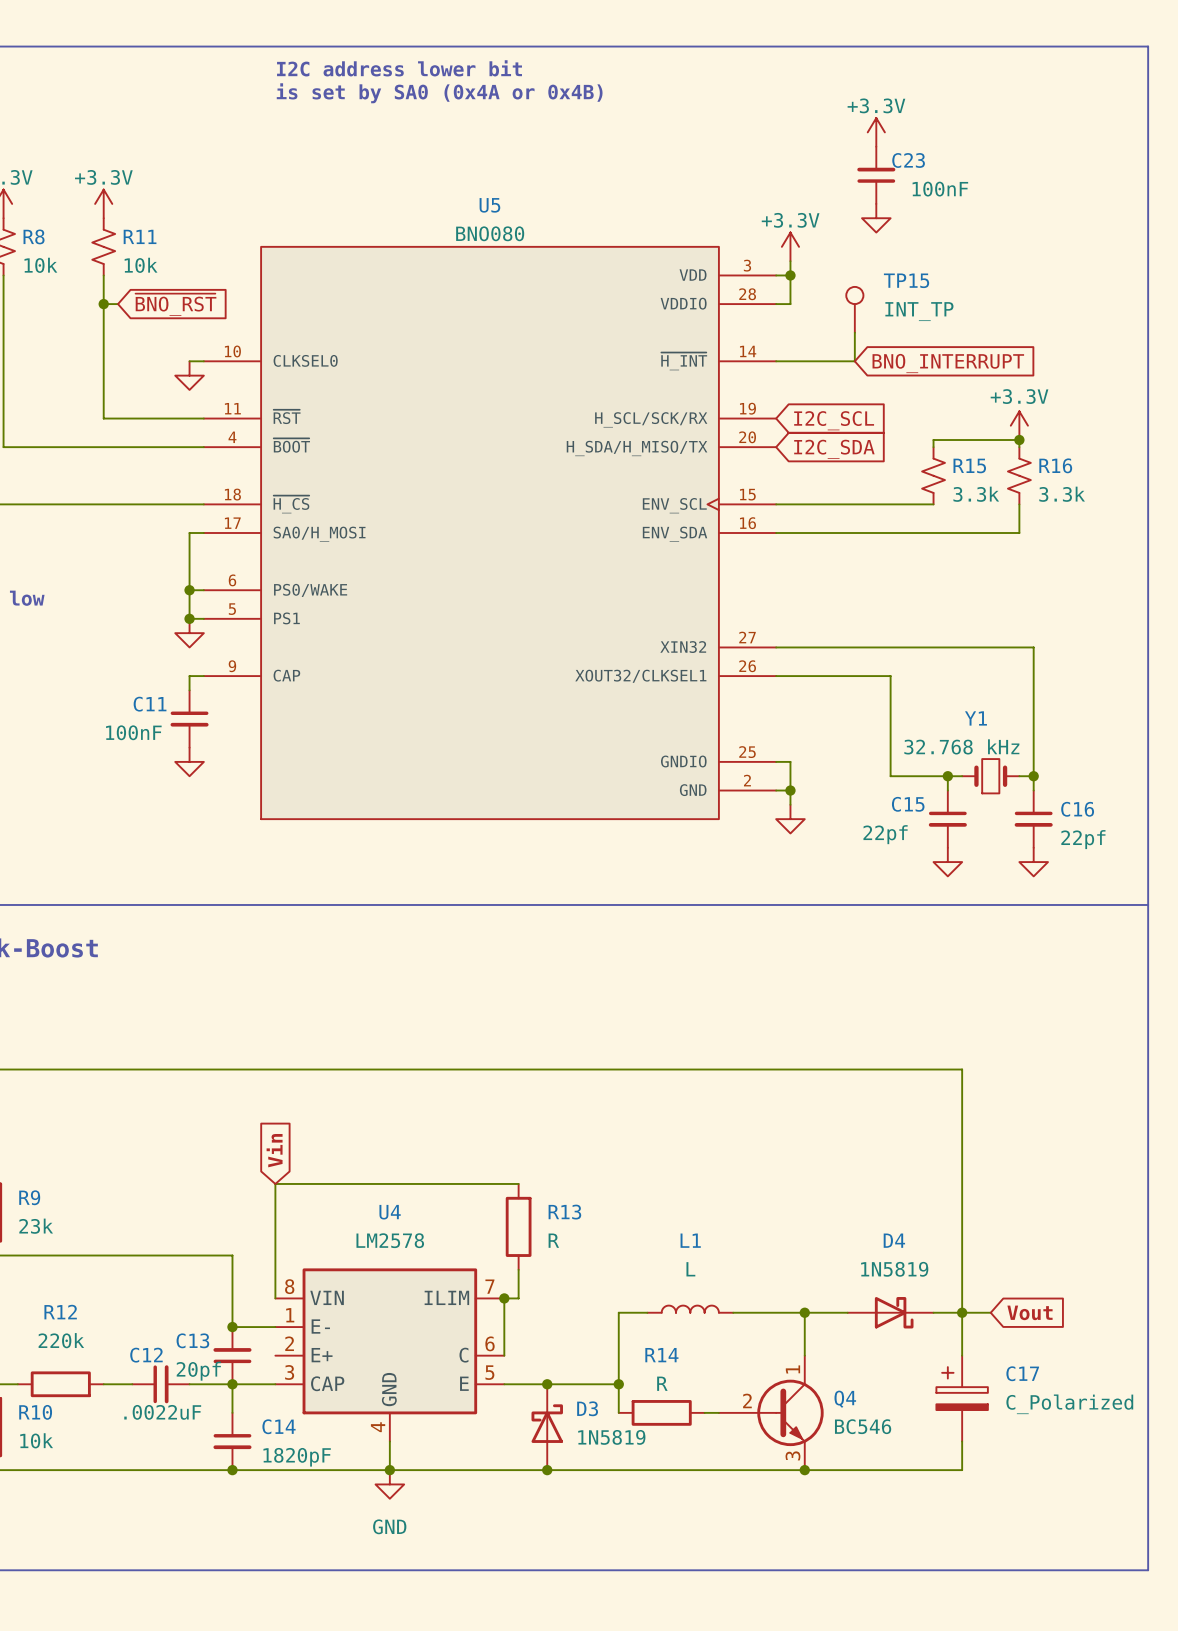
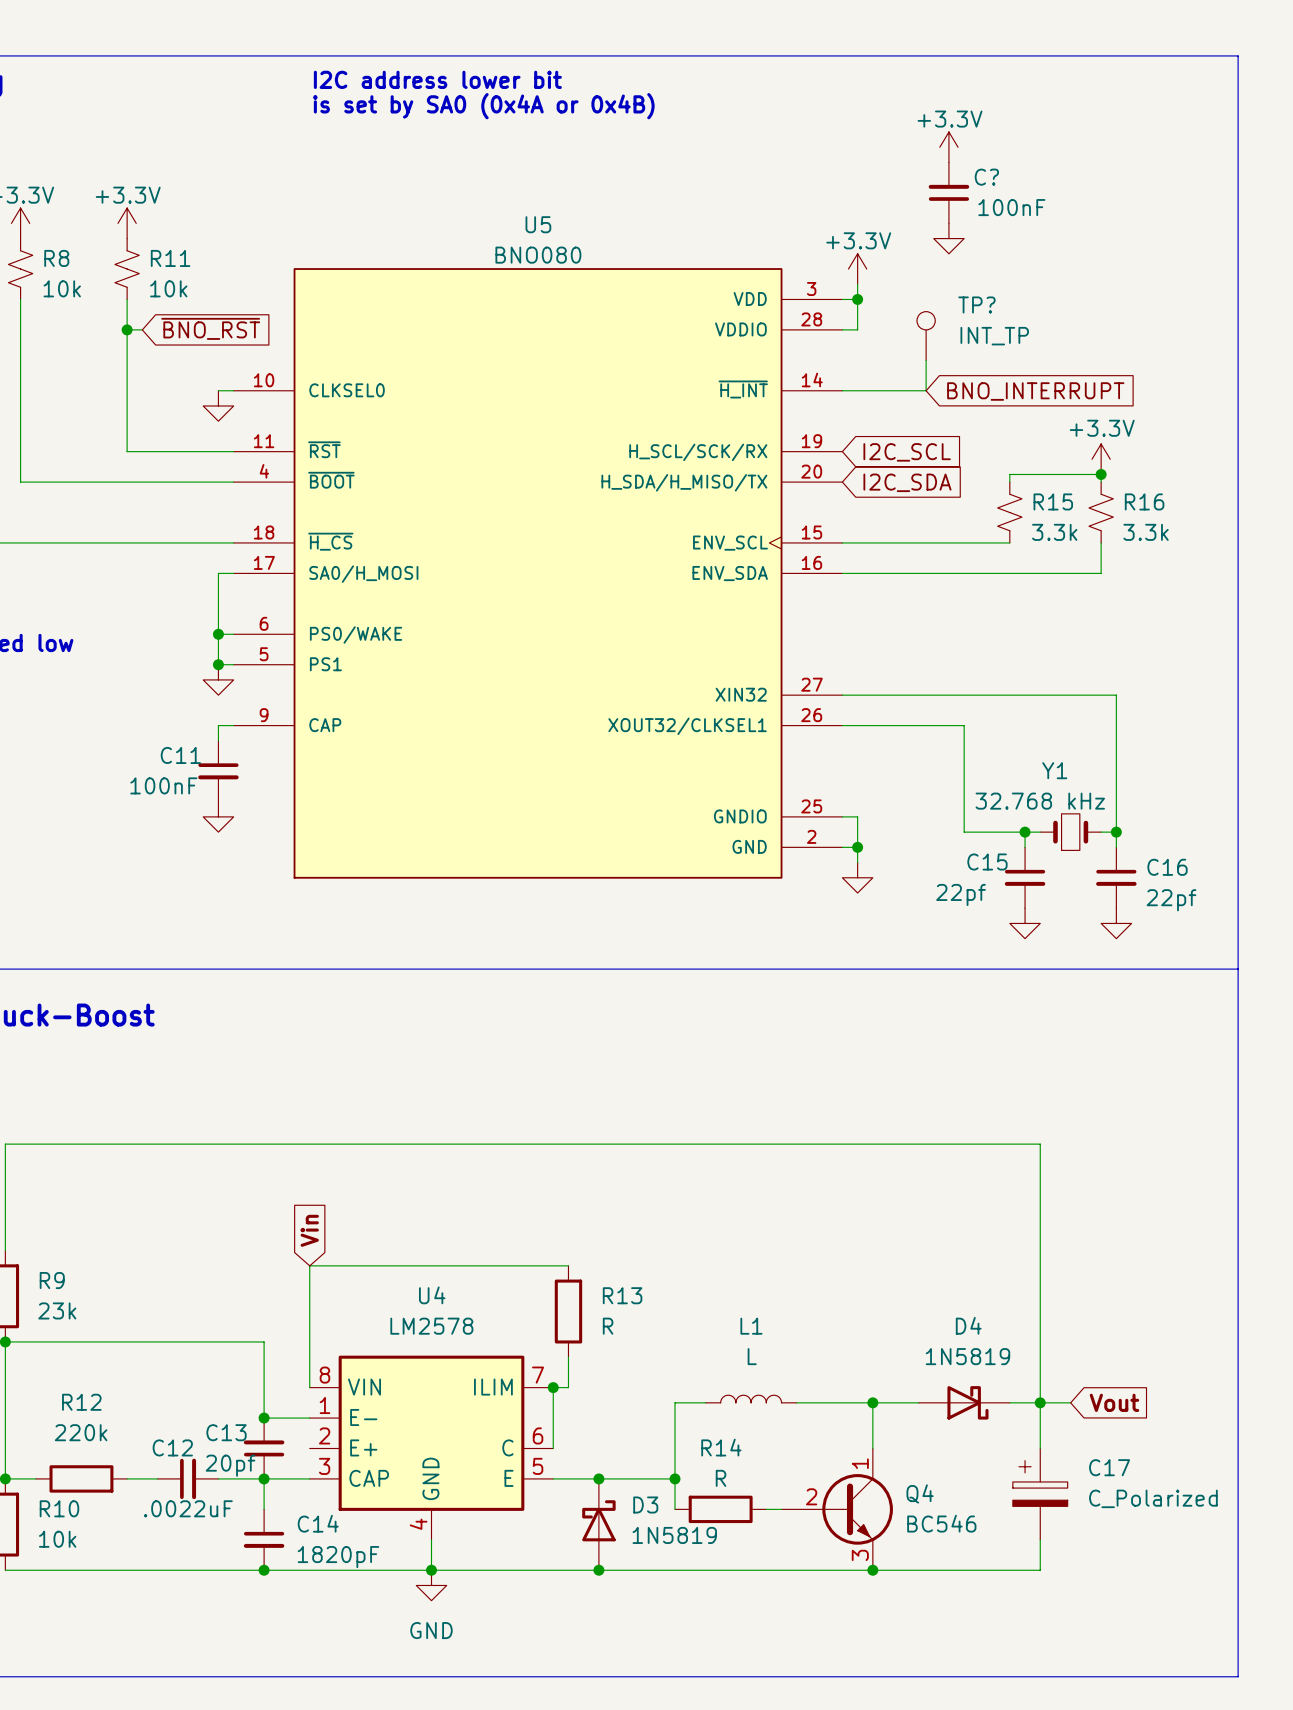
C23 name: C23 (908, 160) -> C? (986, 177)
TP15 name: TP15 (906, 280) -> TP? (976, 304)

